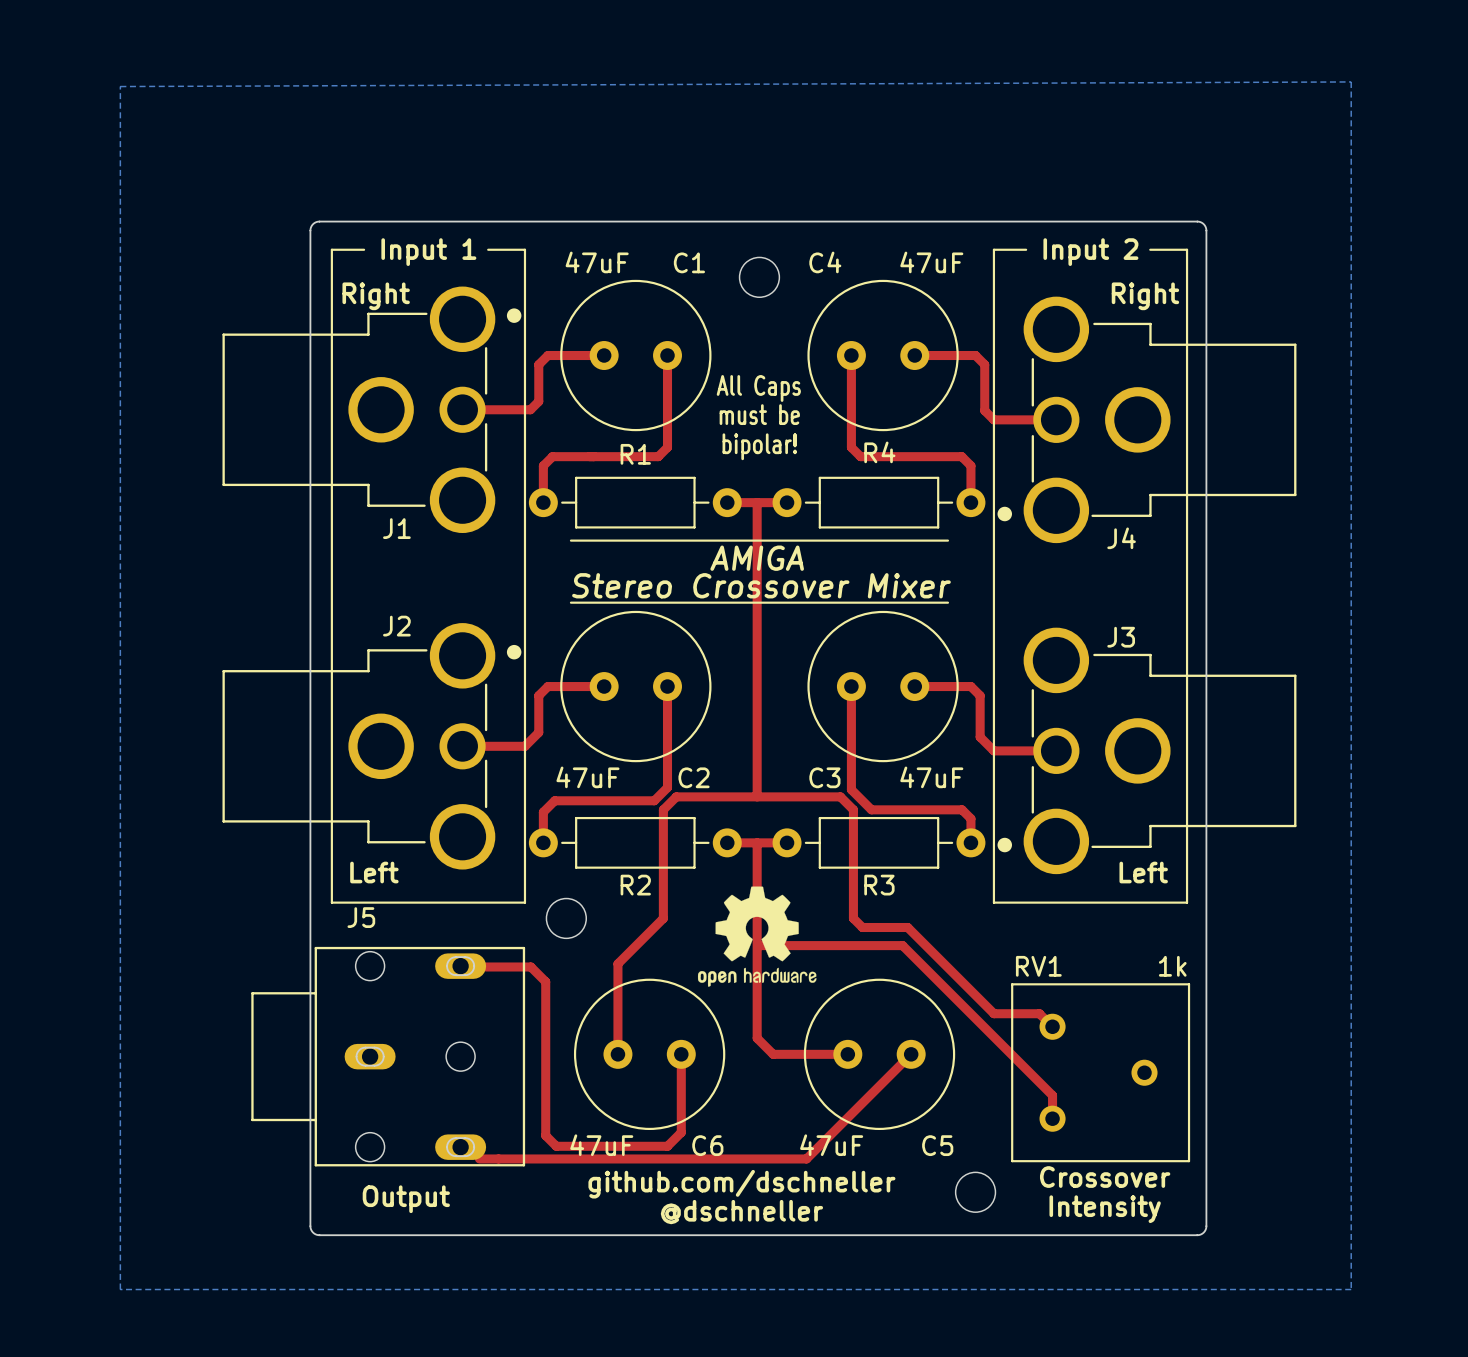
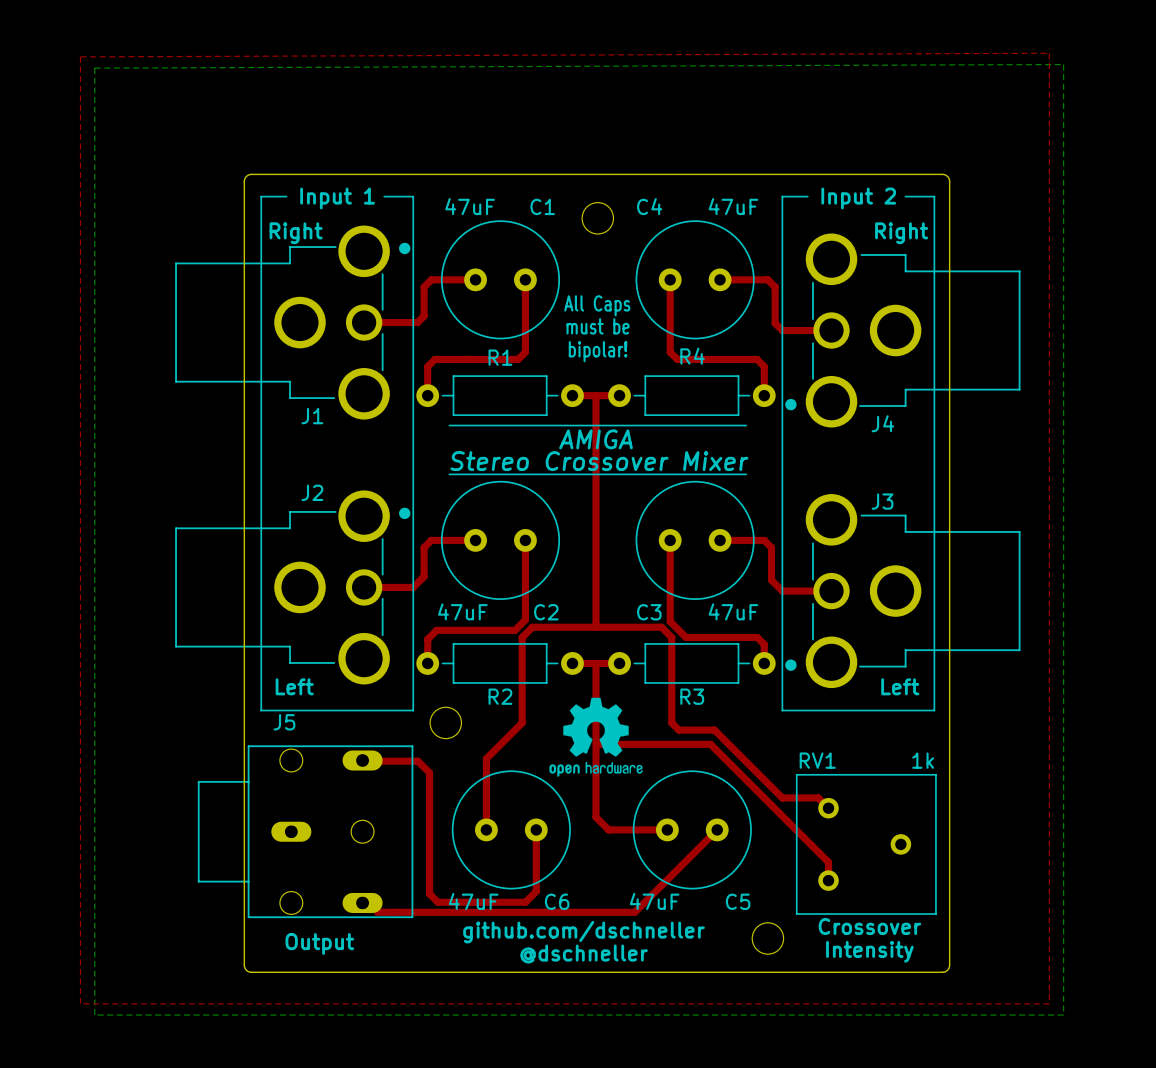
top zone outline: none -> (1049, 53) (80, 56) (80, 1003) (1049, 1003) (1049, 53)

